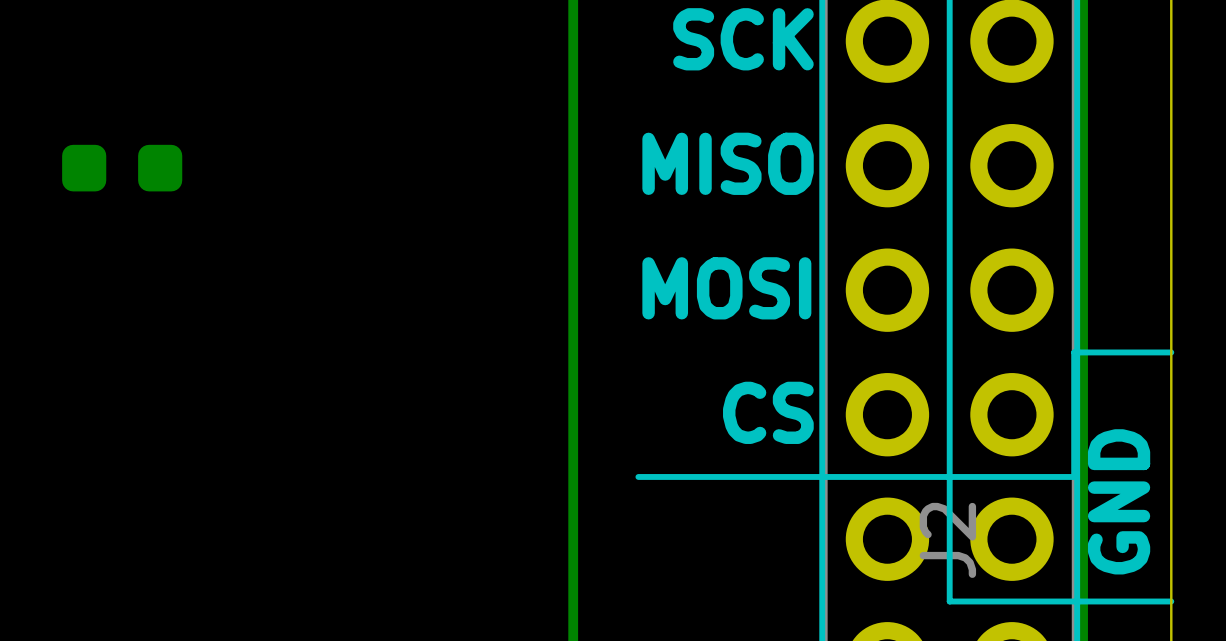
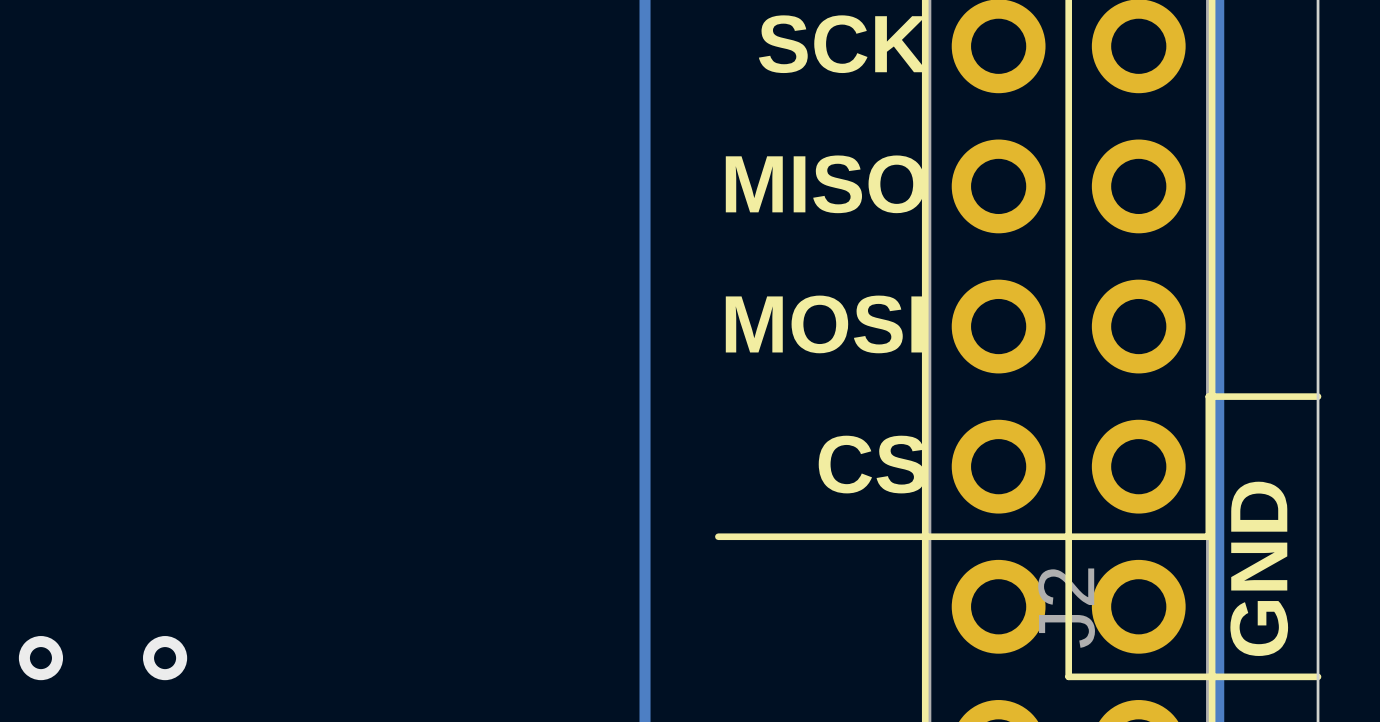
part: (122, 168) -> none
via: none -> (40, 658)
via: none -> (165, 658)

